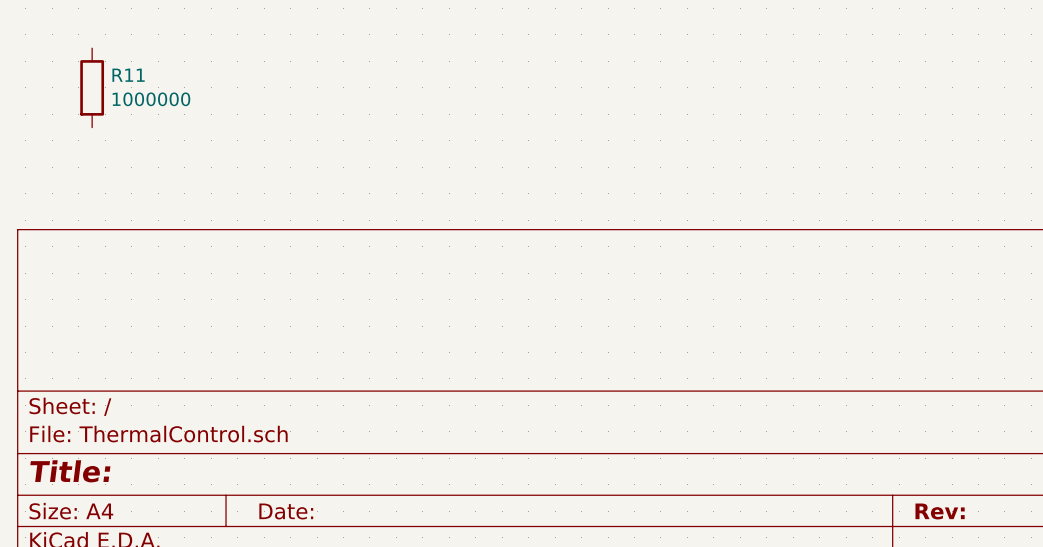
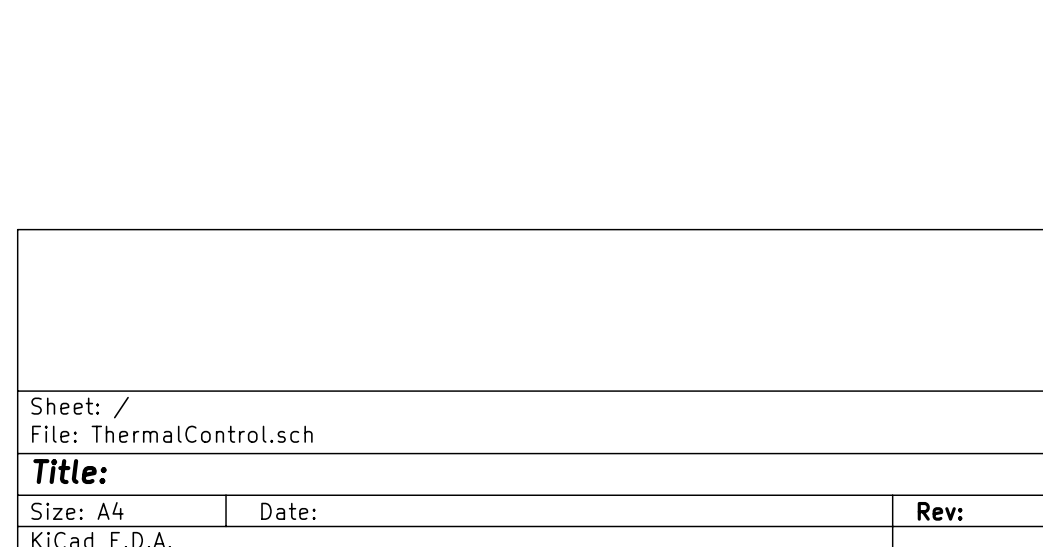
R11: 1000000 (92, 87) -> none

